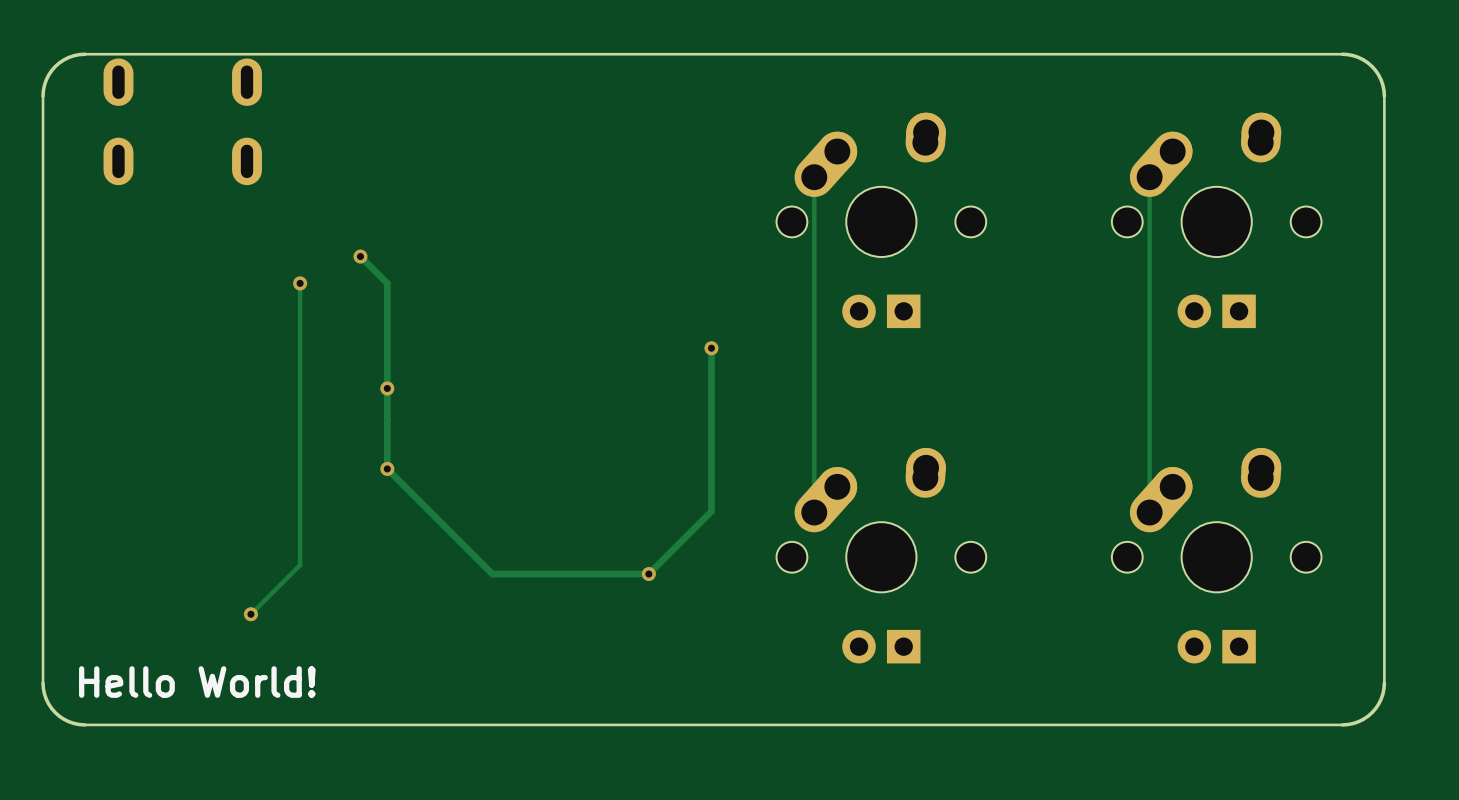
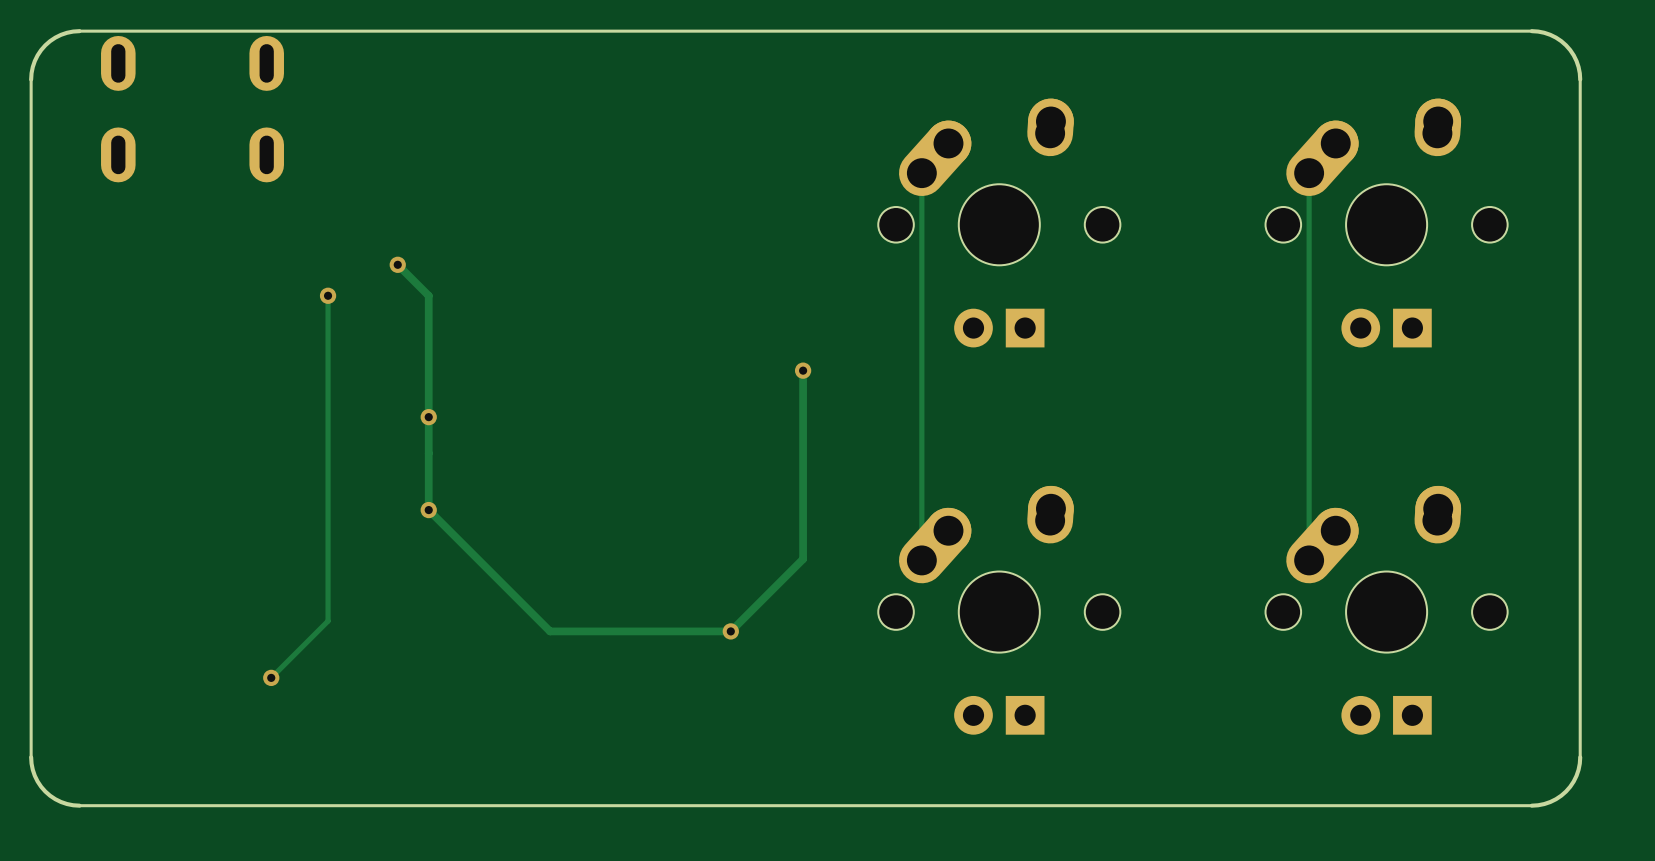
text: Hello World! (197, 682) -> none

